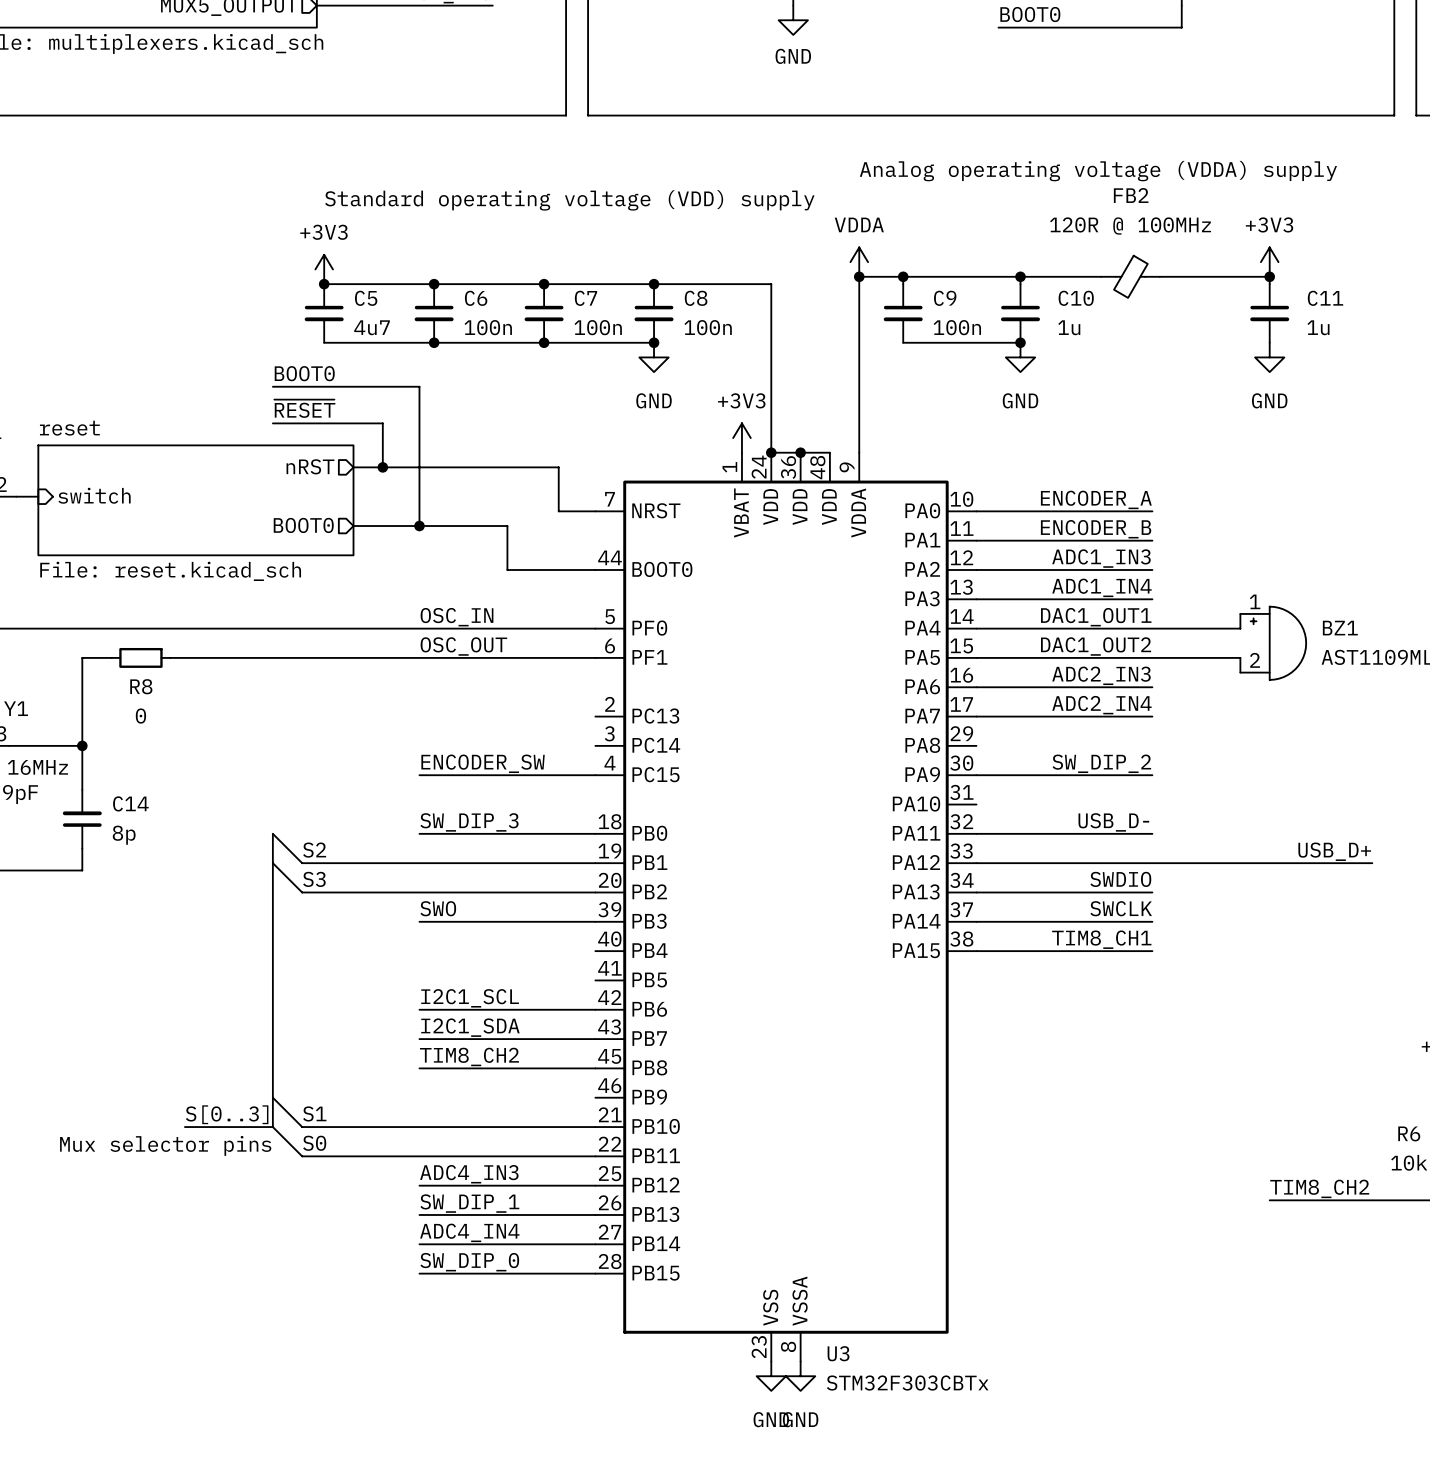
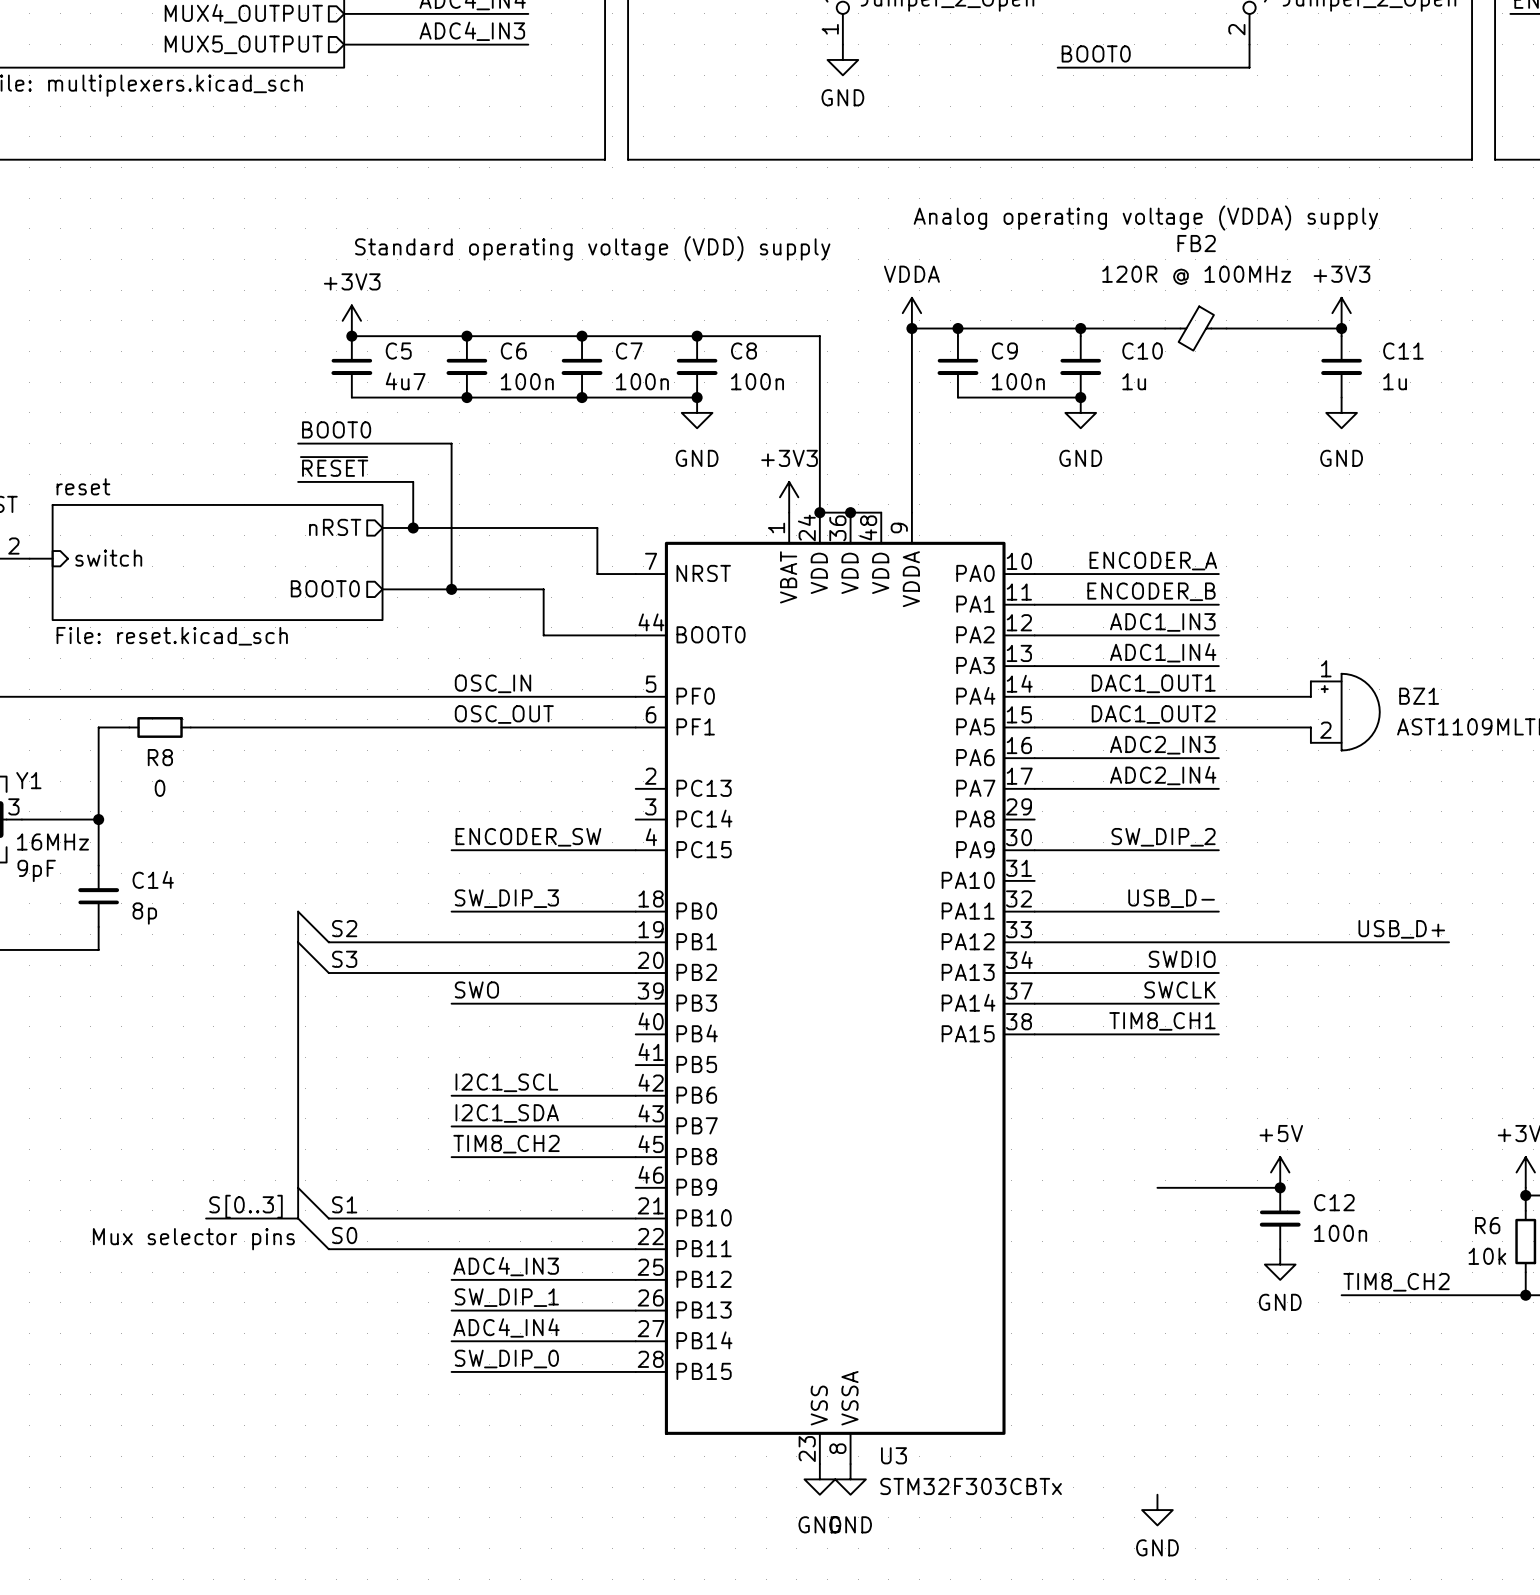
power symbol: none -> +5V (1280, 1172)
wire: none -> (1157, 1187) (1280, 1187)
junction: none -> (1280, 1187)
C12: none -> 100n (1280, 1218)
power symbol: none -> GND (1280, 1264)
power symbol: none -> GND (1157, 1510)

